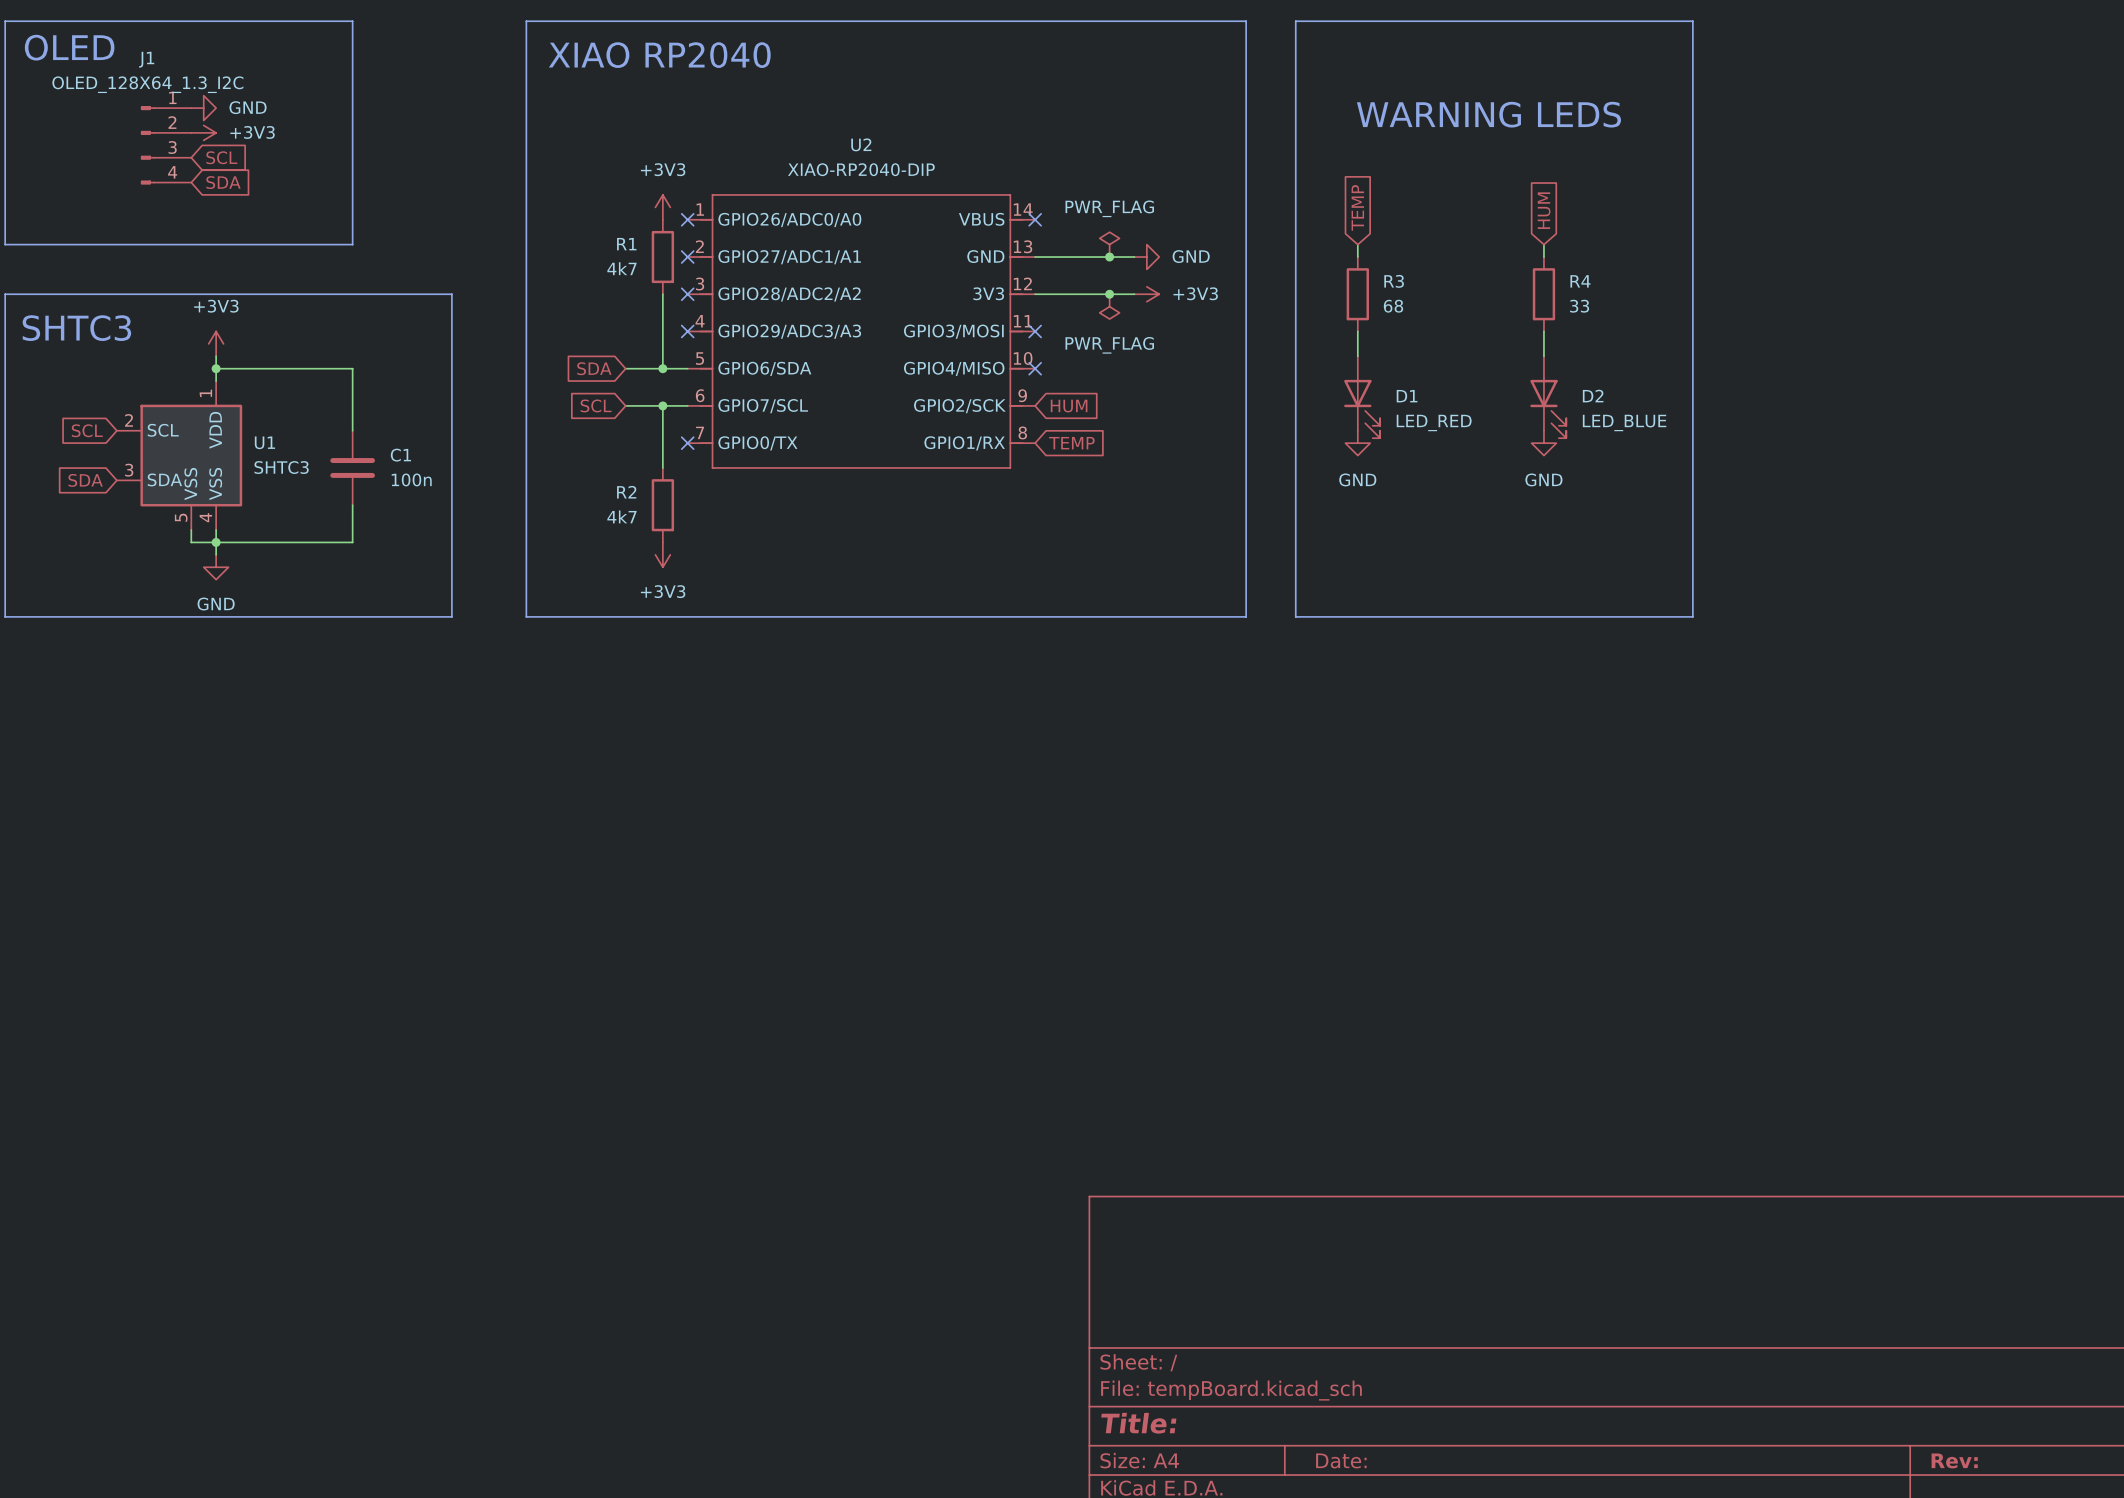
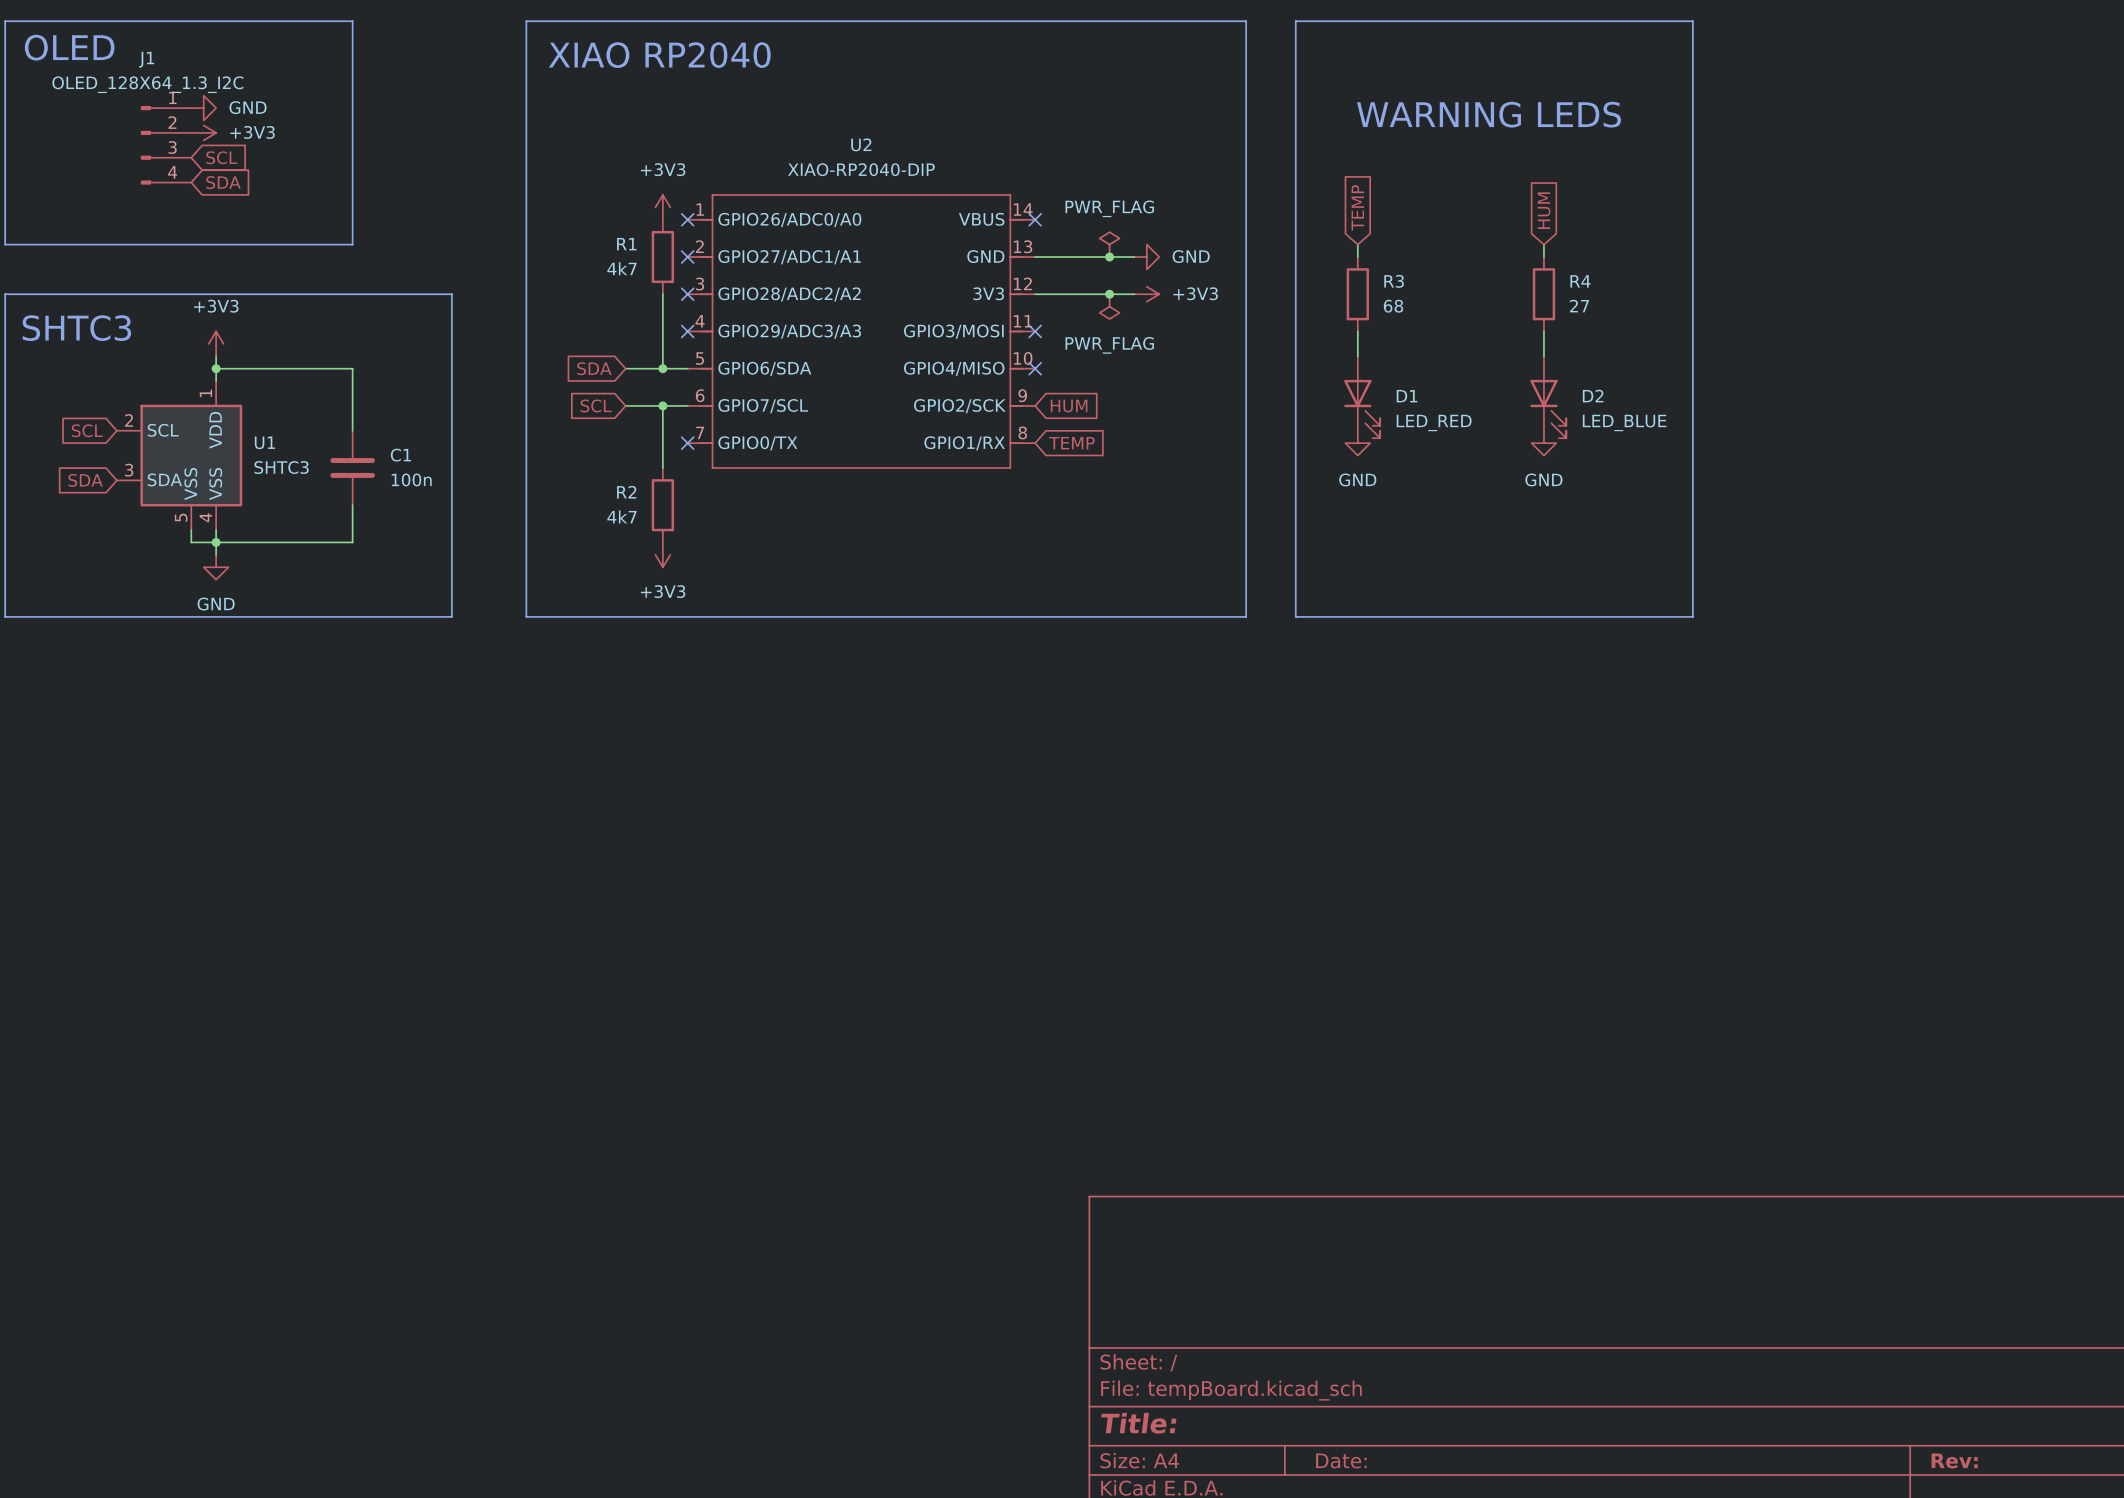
R4 value: 33 (1579, 306) -> 27 (1579, 306)

